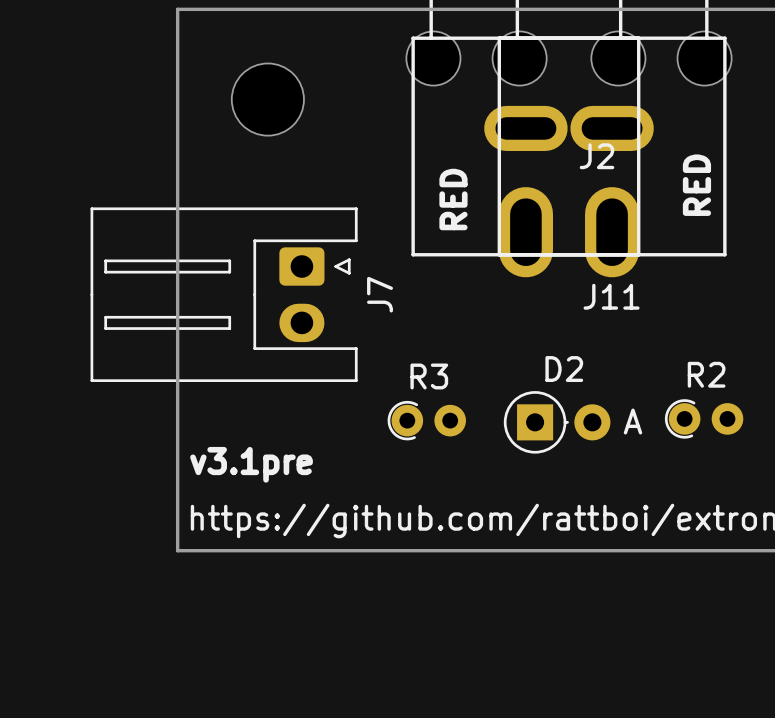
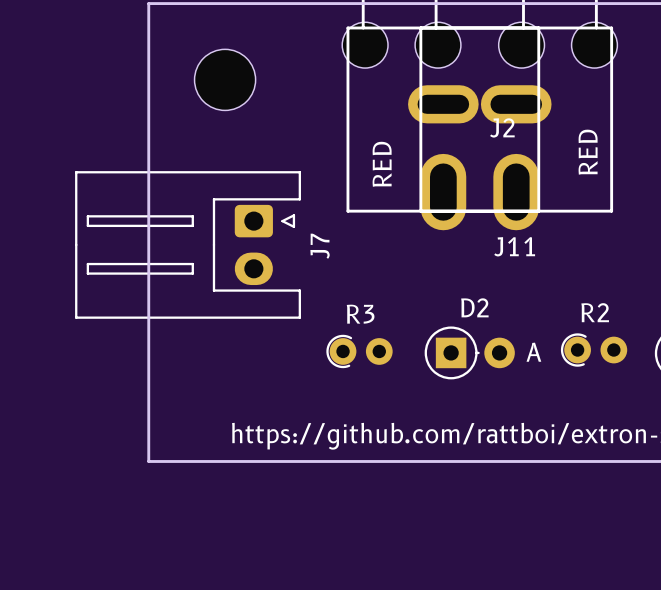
text: v3.1pre (251, 464) -> none

